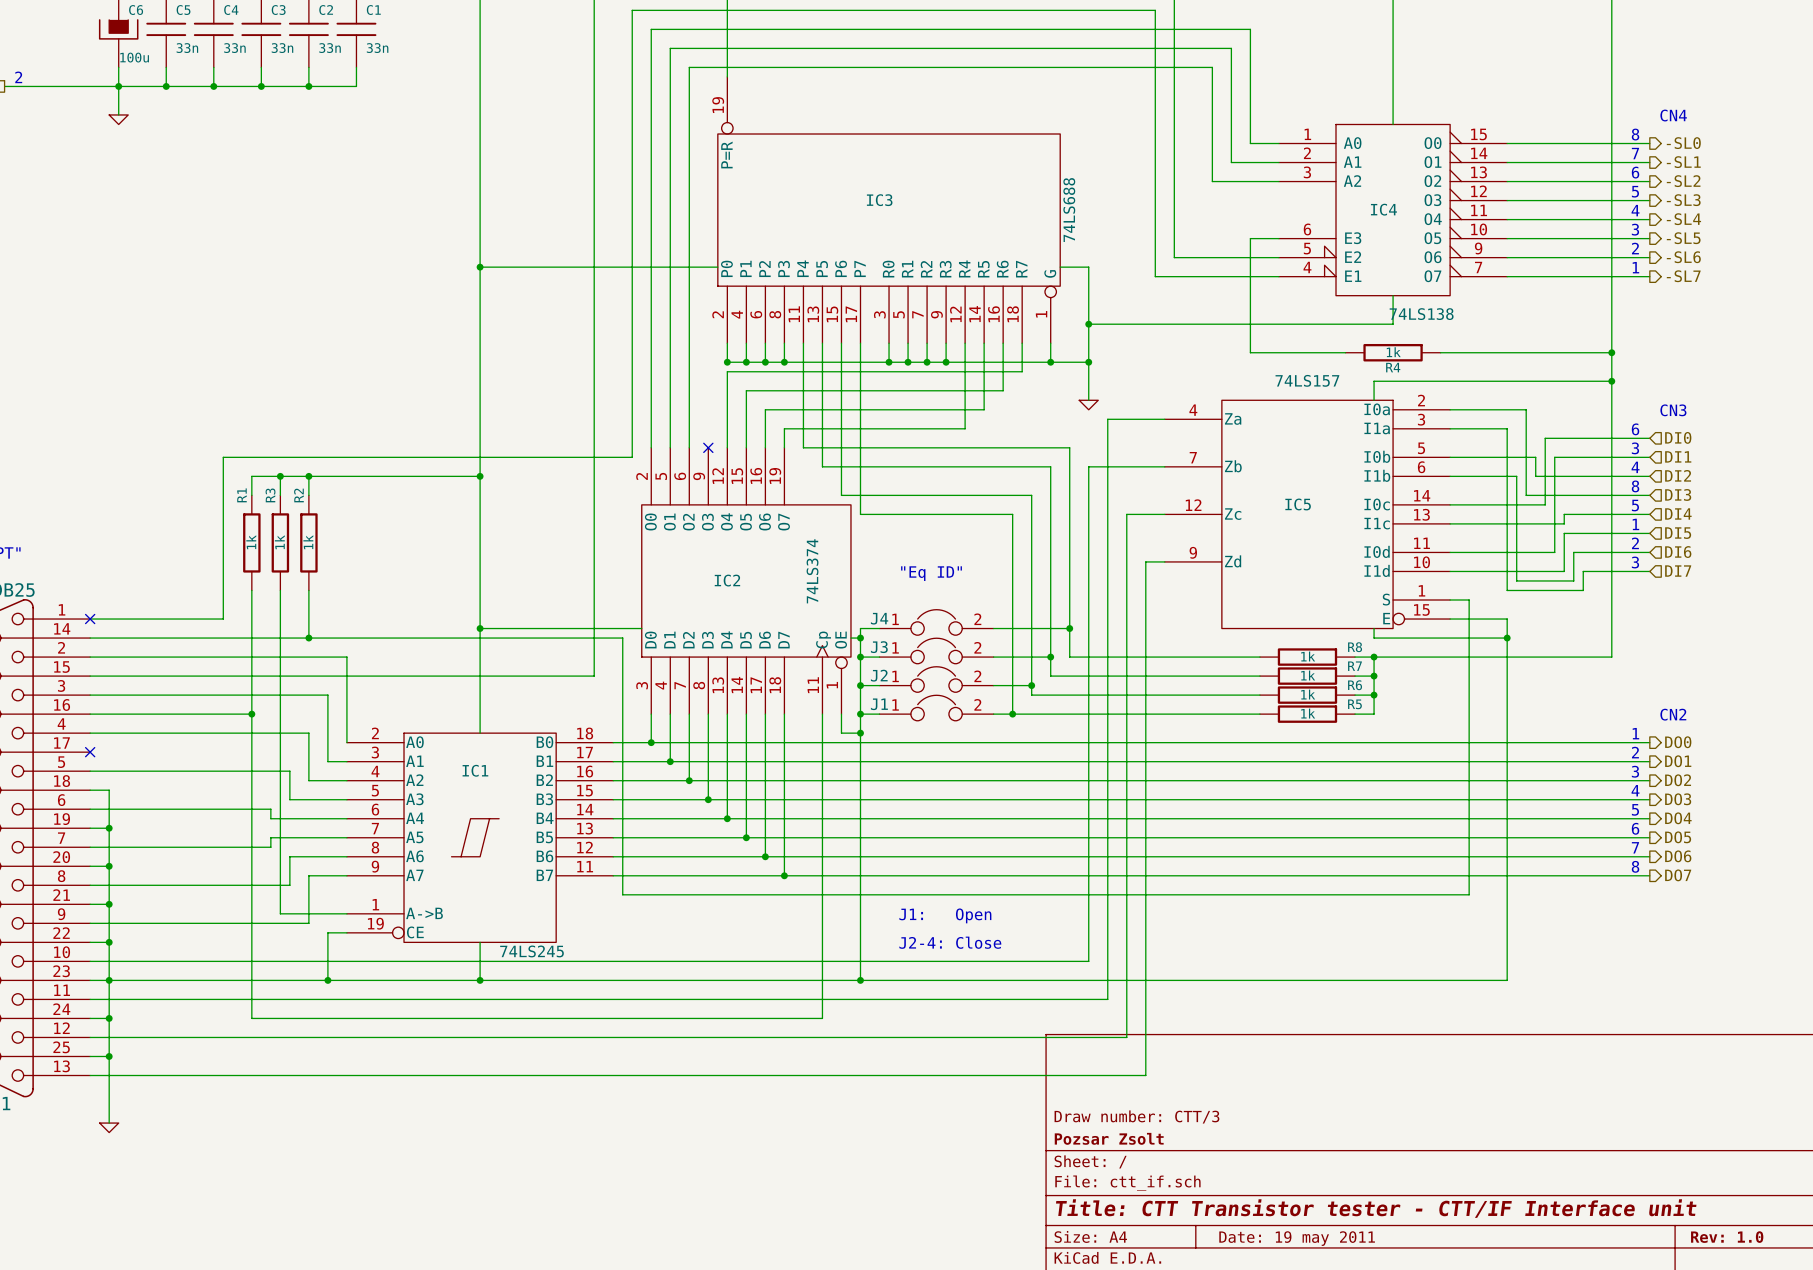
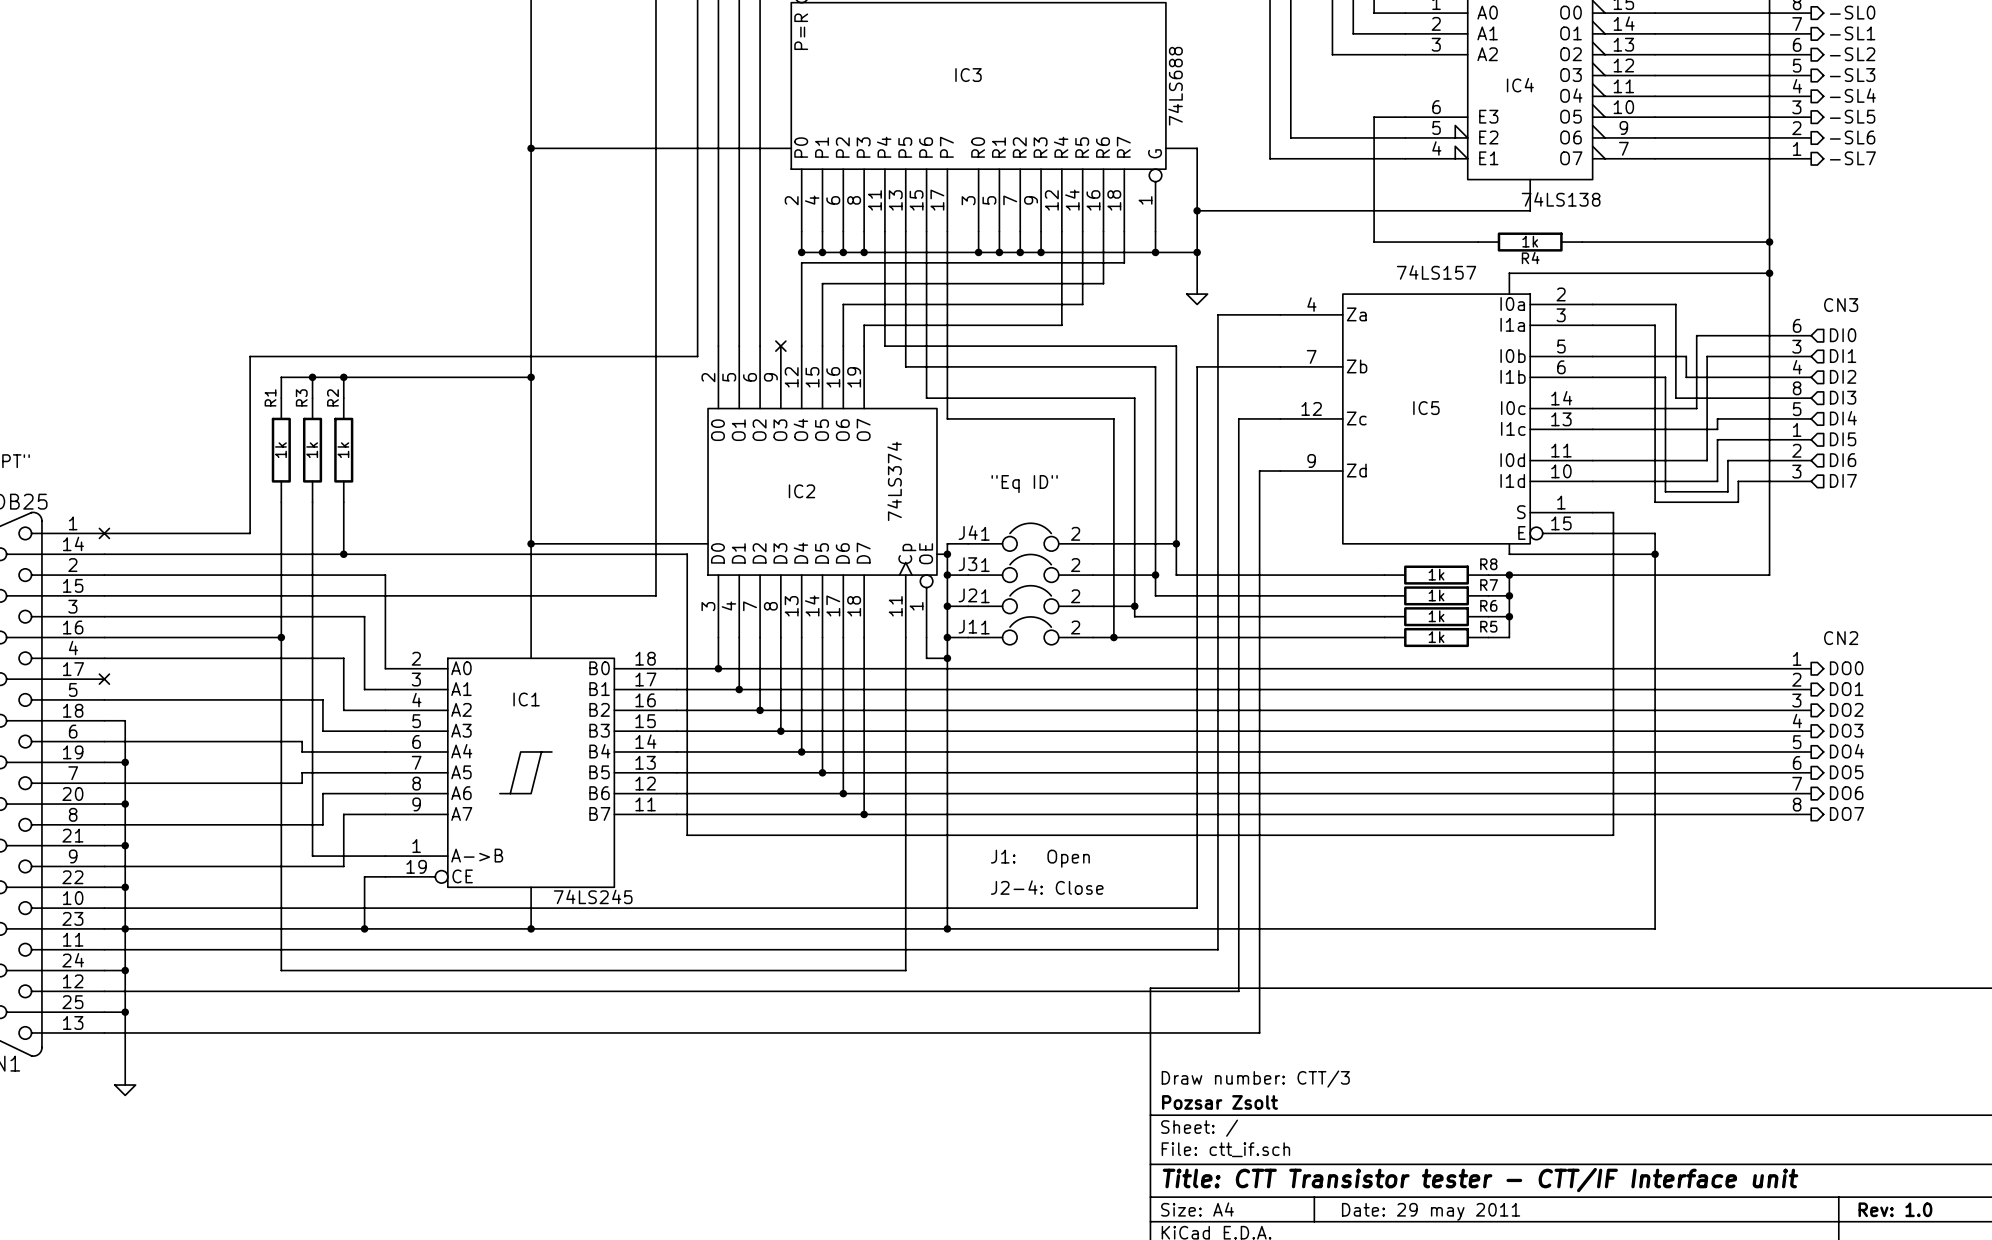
title block: Date: 19 may 2011 (1297, 1238) -> Date: 29 may 2011 (1431, 1211)

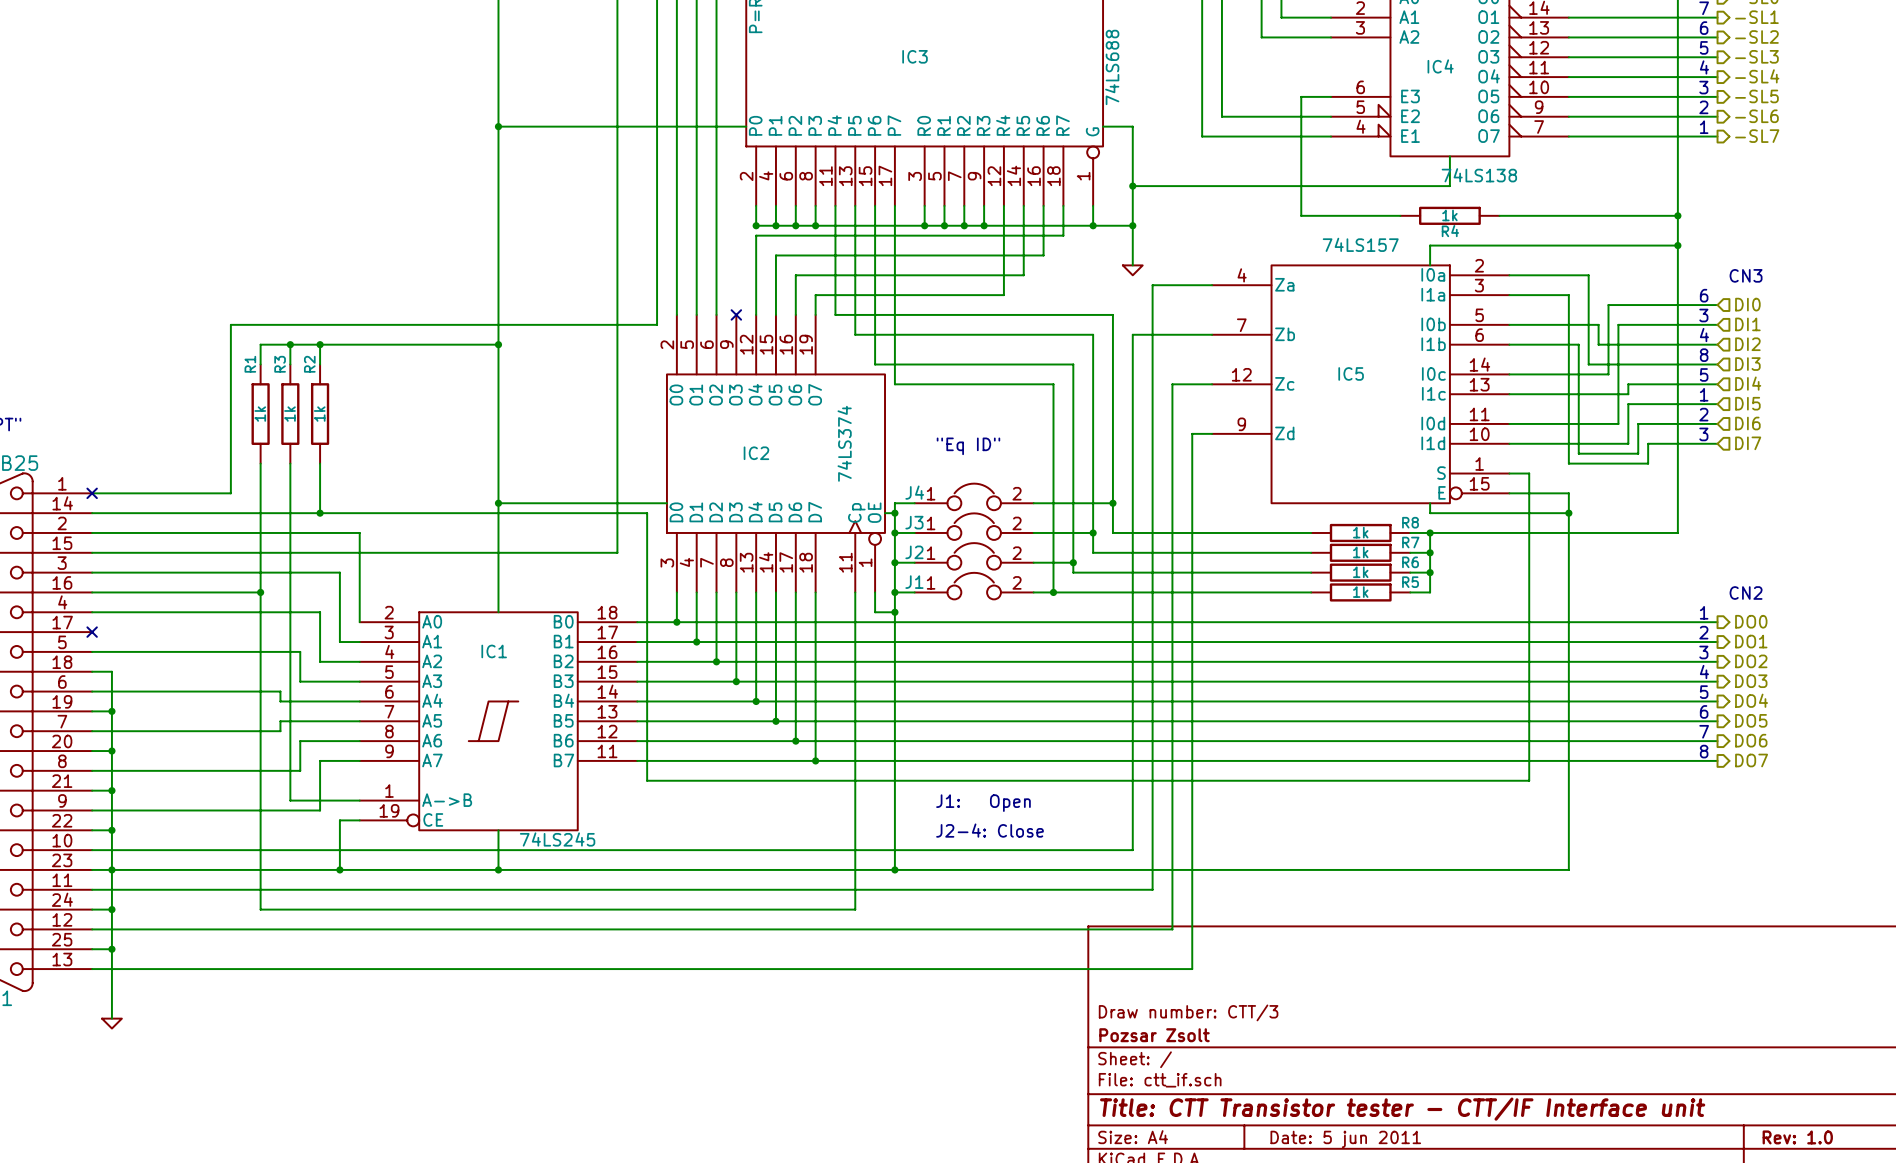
title block: Date: 29 may 2011 (1431, 1211) -> Date: 5 jun 2011 (1345, 1139)

